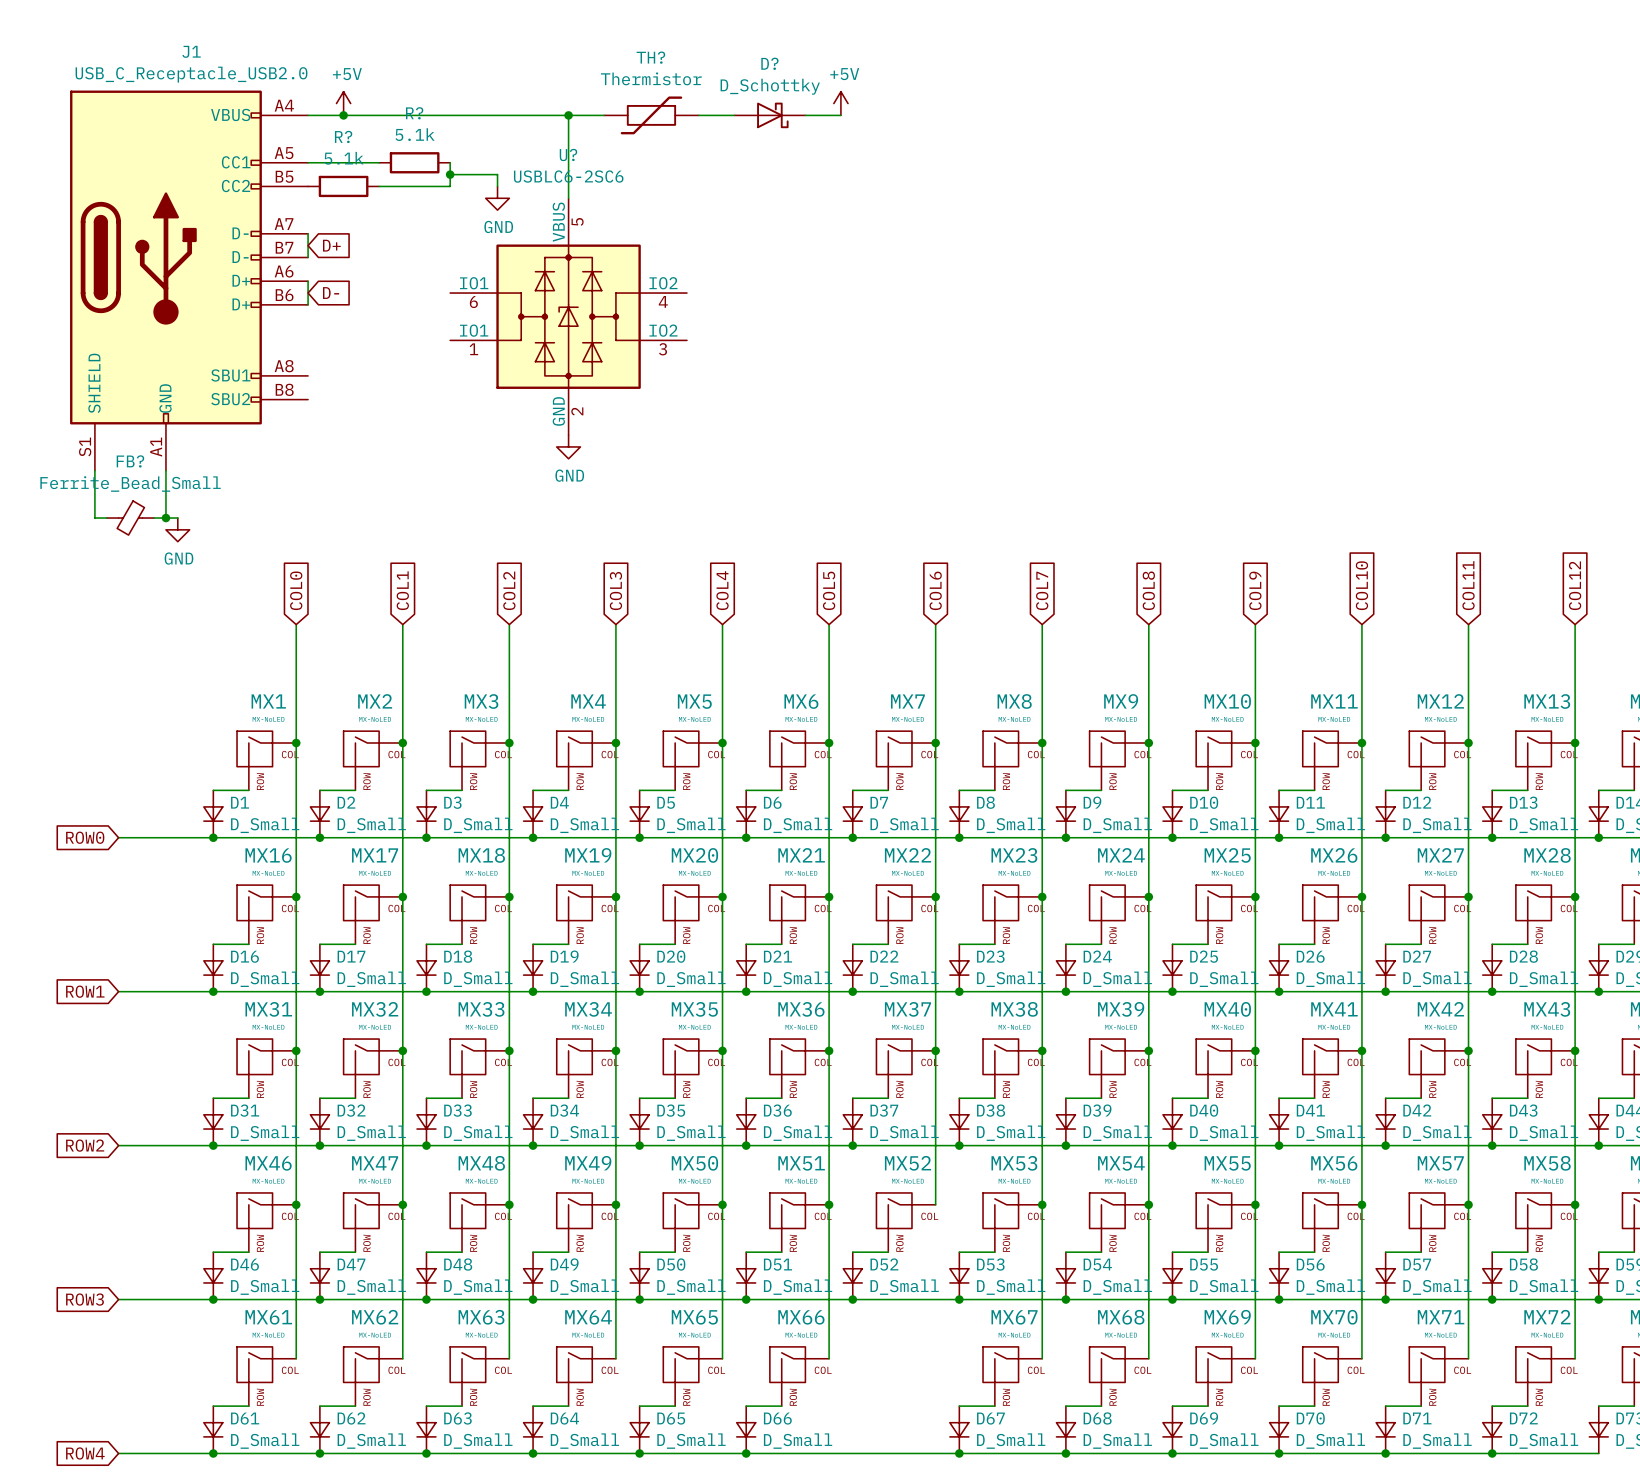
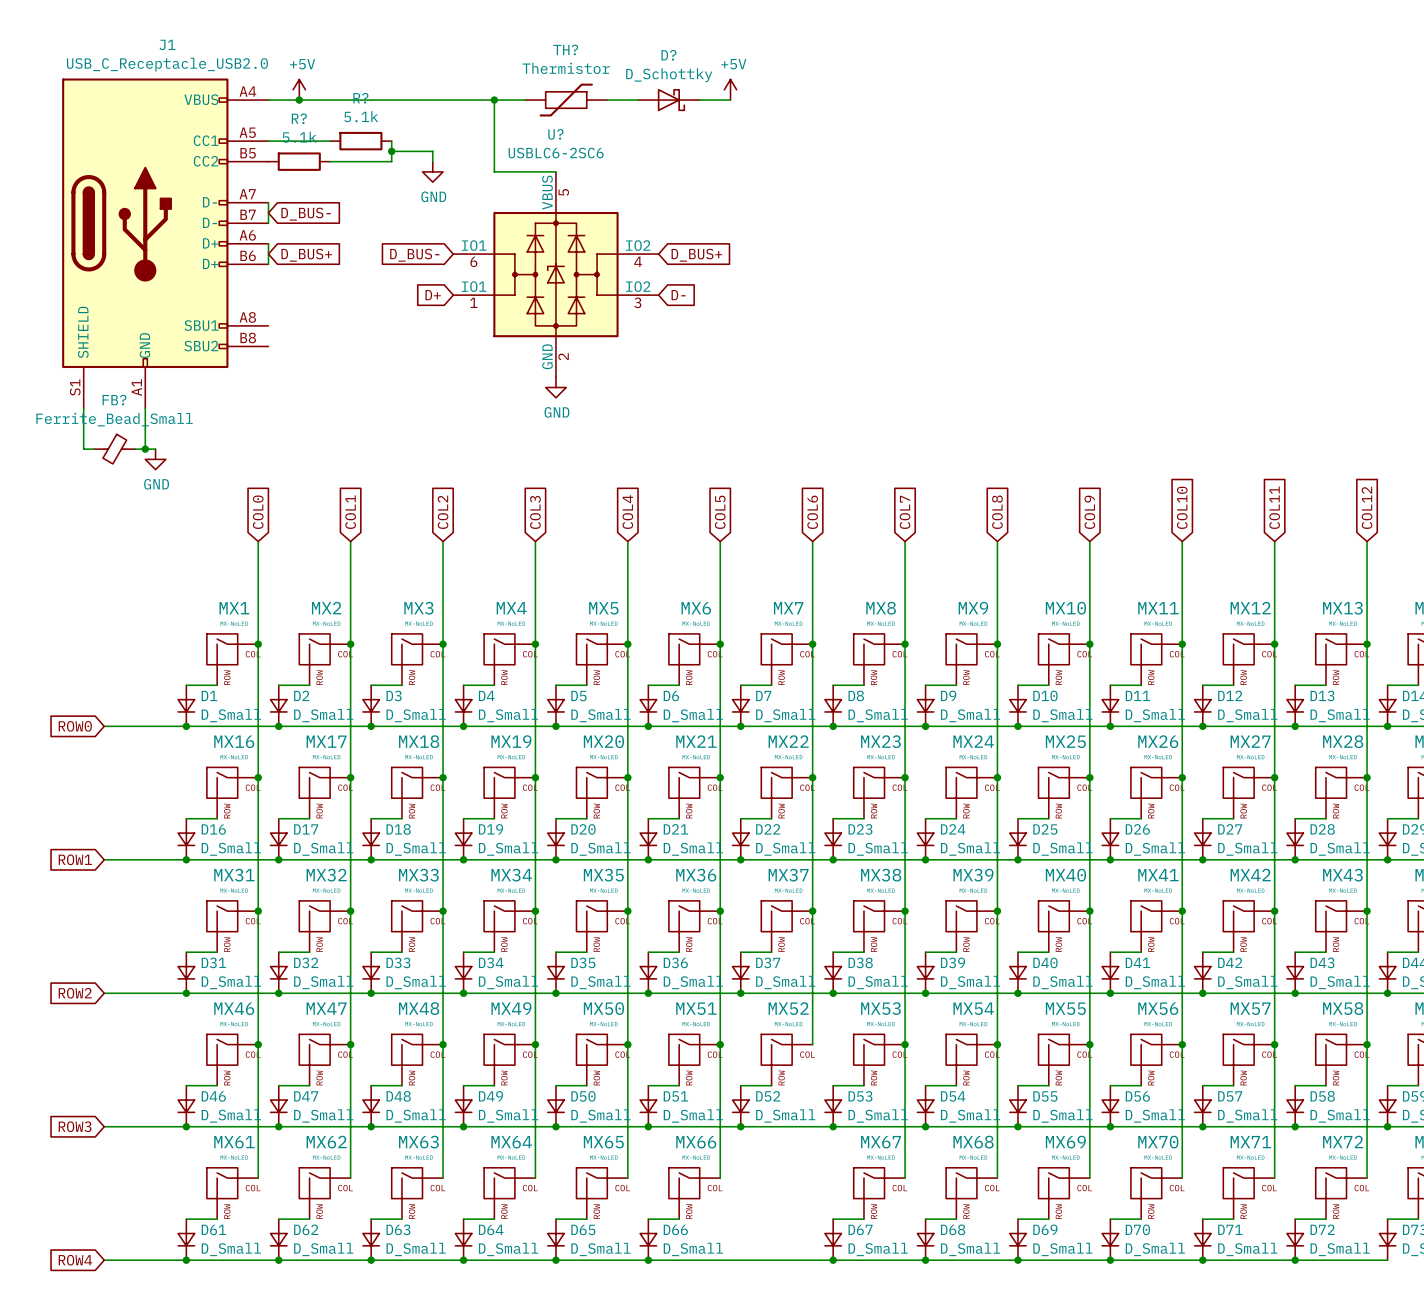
wire: none -> (494, 171) (555, 171)
global label: D+ (331, 245) -> D_BUS- (306, 214)
global label: D- (331, 293) -> D_BUS+ (306, 255)
global label: none -> D_BUS- (414, 255)
global label: none -> D_BUS+ (696, 255)
U? position: (568, 316) -> (555, 274)
global label: none -> D+ (433, 295)
global label: none -> D- (678, 295)
power symbol position: GND (568, 446) -> GND (555, 387)

